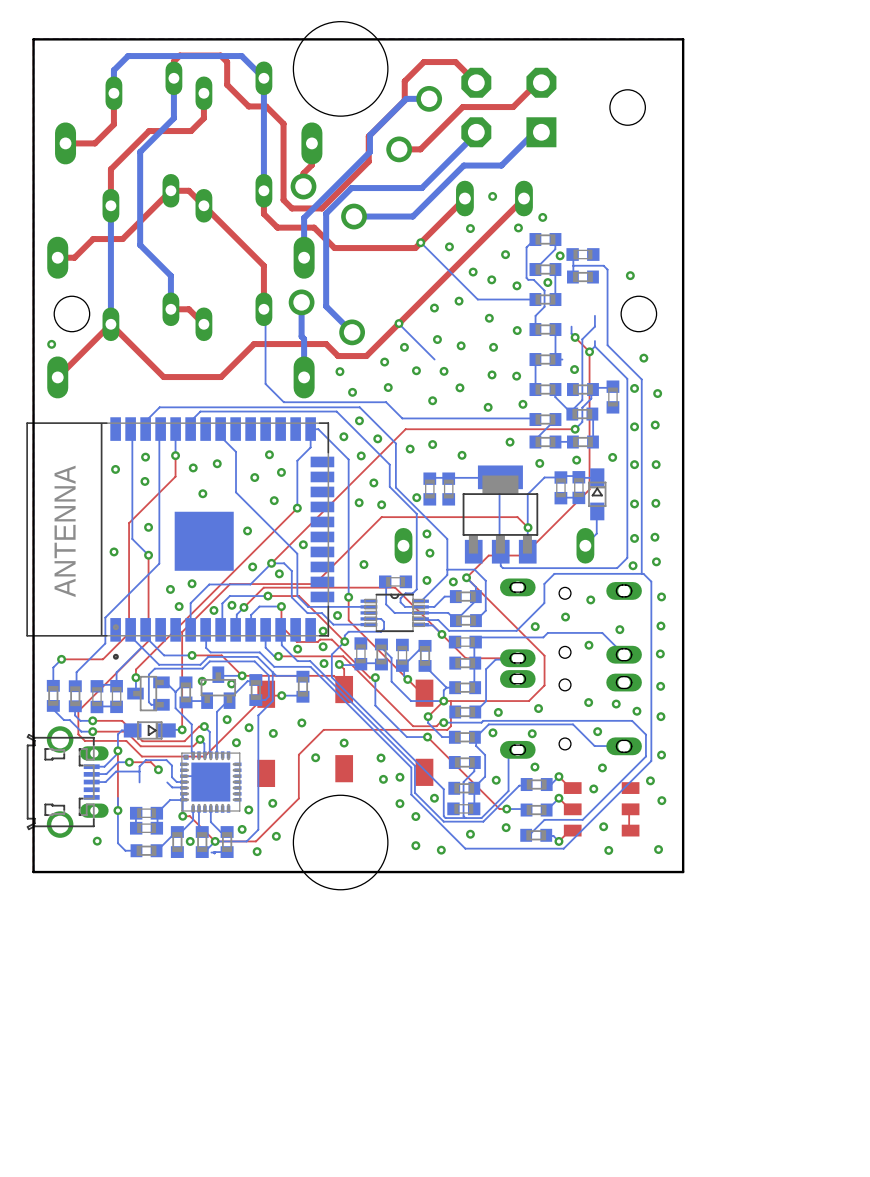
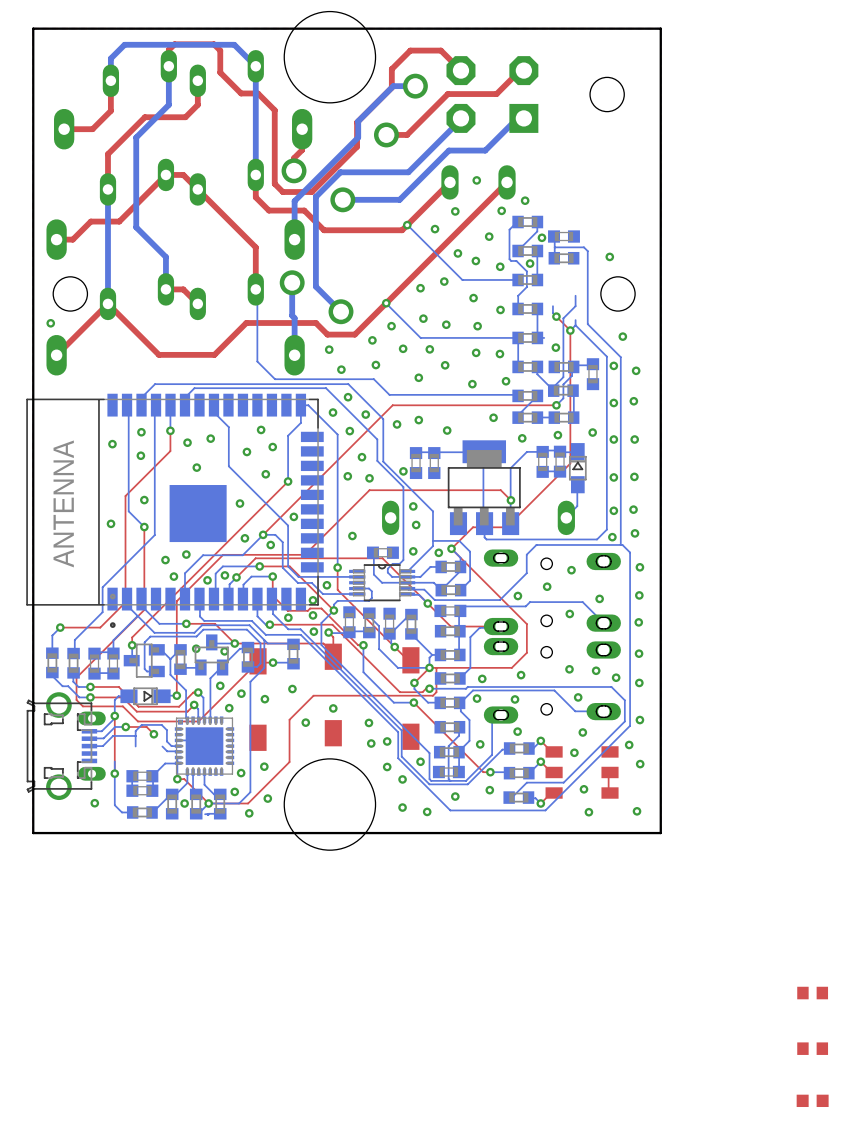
bottom track: none -> (420, 337) (518, 339)
part: none -> (812, 993)
part: none -> (812, 1048)
part: none -> (812, 1100)

